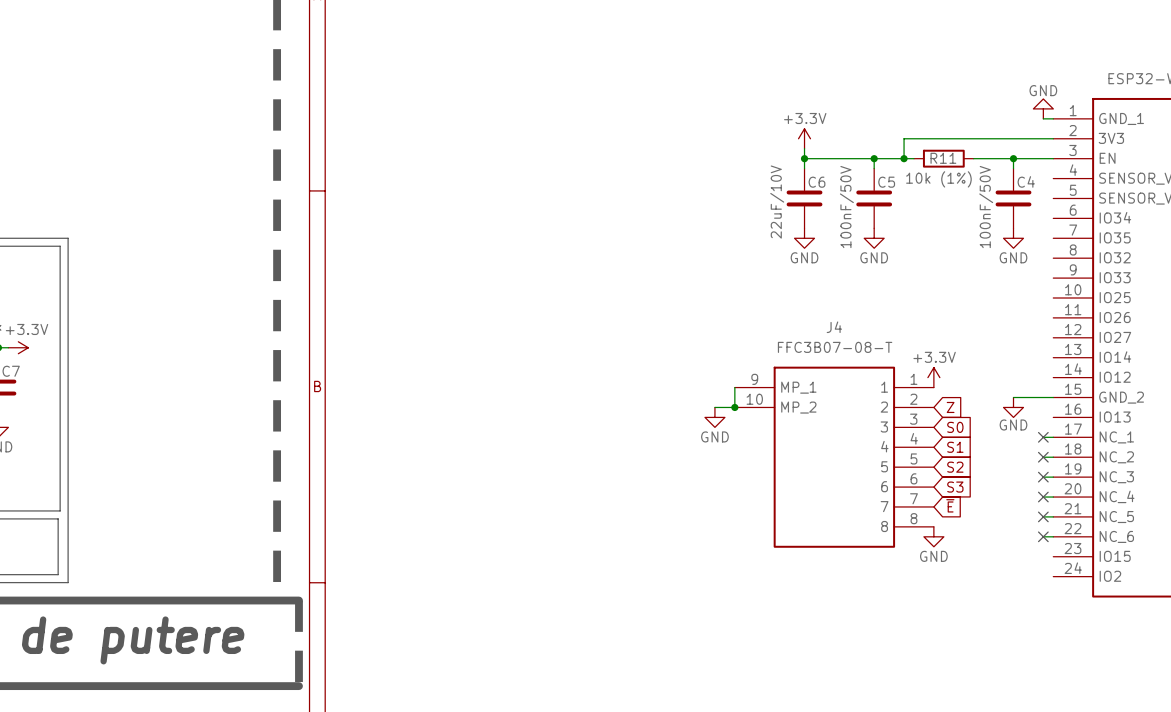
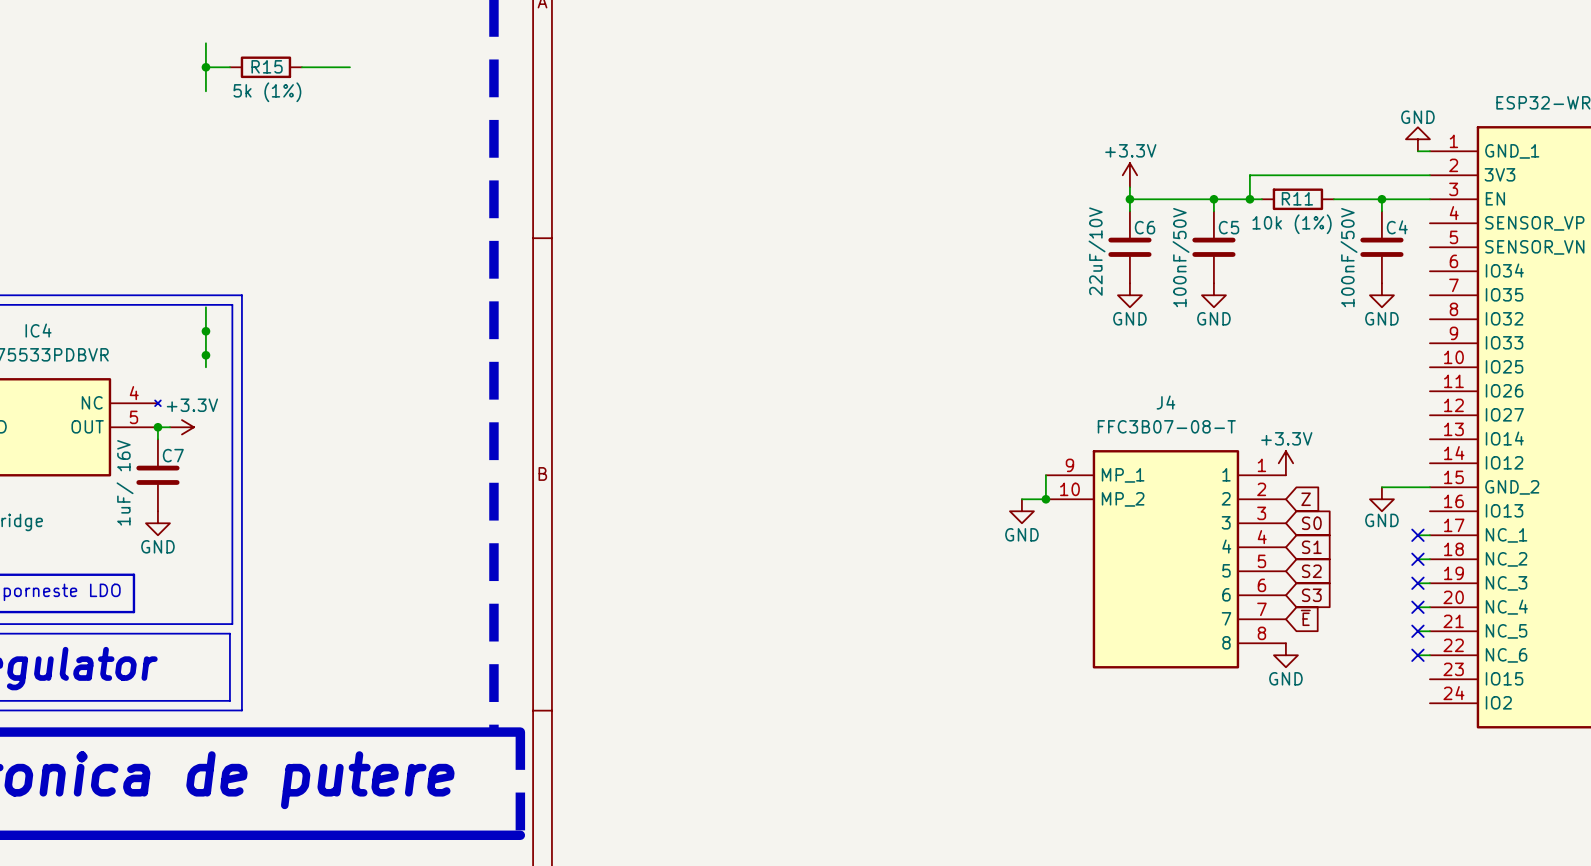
wire: none -> (205, 43) (205, 91)
wire: none -> (205, 67) (229, 67)
junction: none -> (205, 67)
R15: none -> 5k (1%) (265, 67)
wire: none -> (301, 67) (349, 67)
wire: none -> (205, 307) (205, 367)
junction: none -> (205, 331)
junction: none -> (205, 355)

